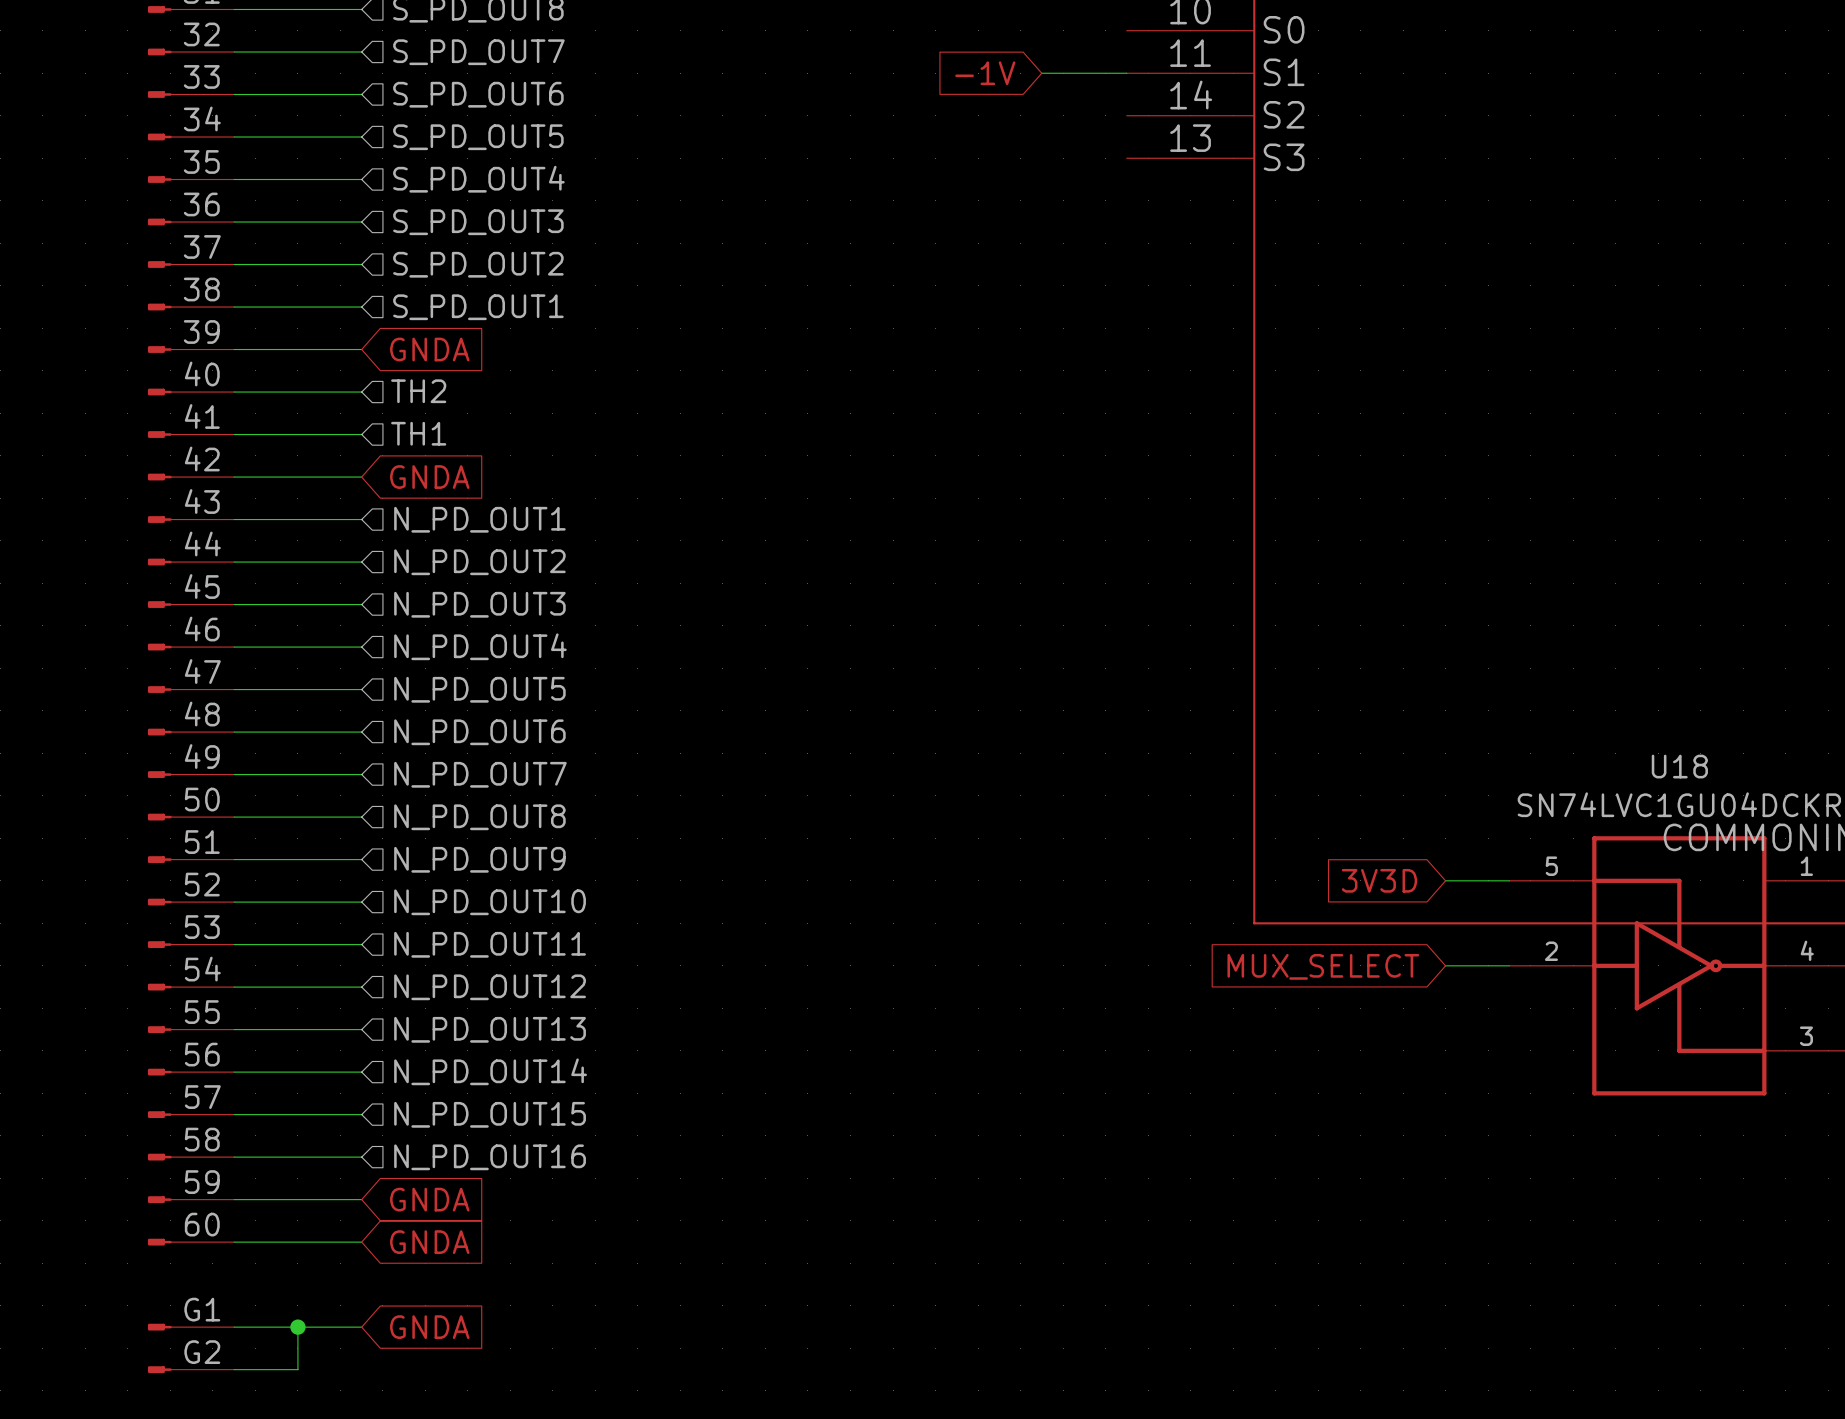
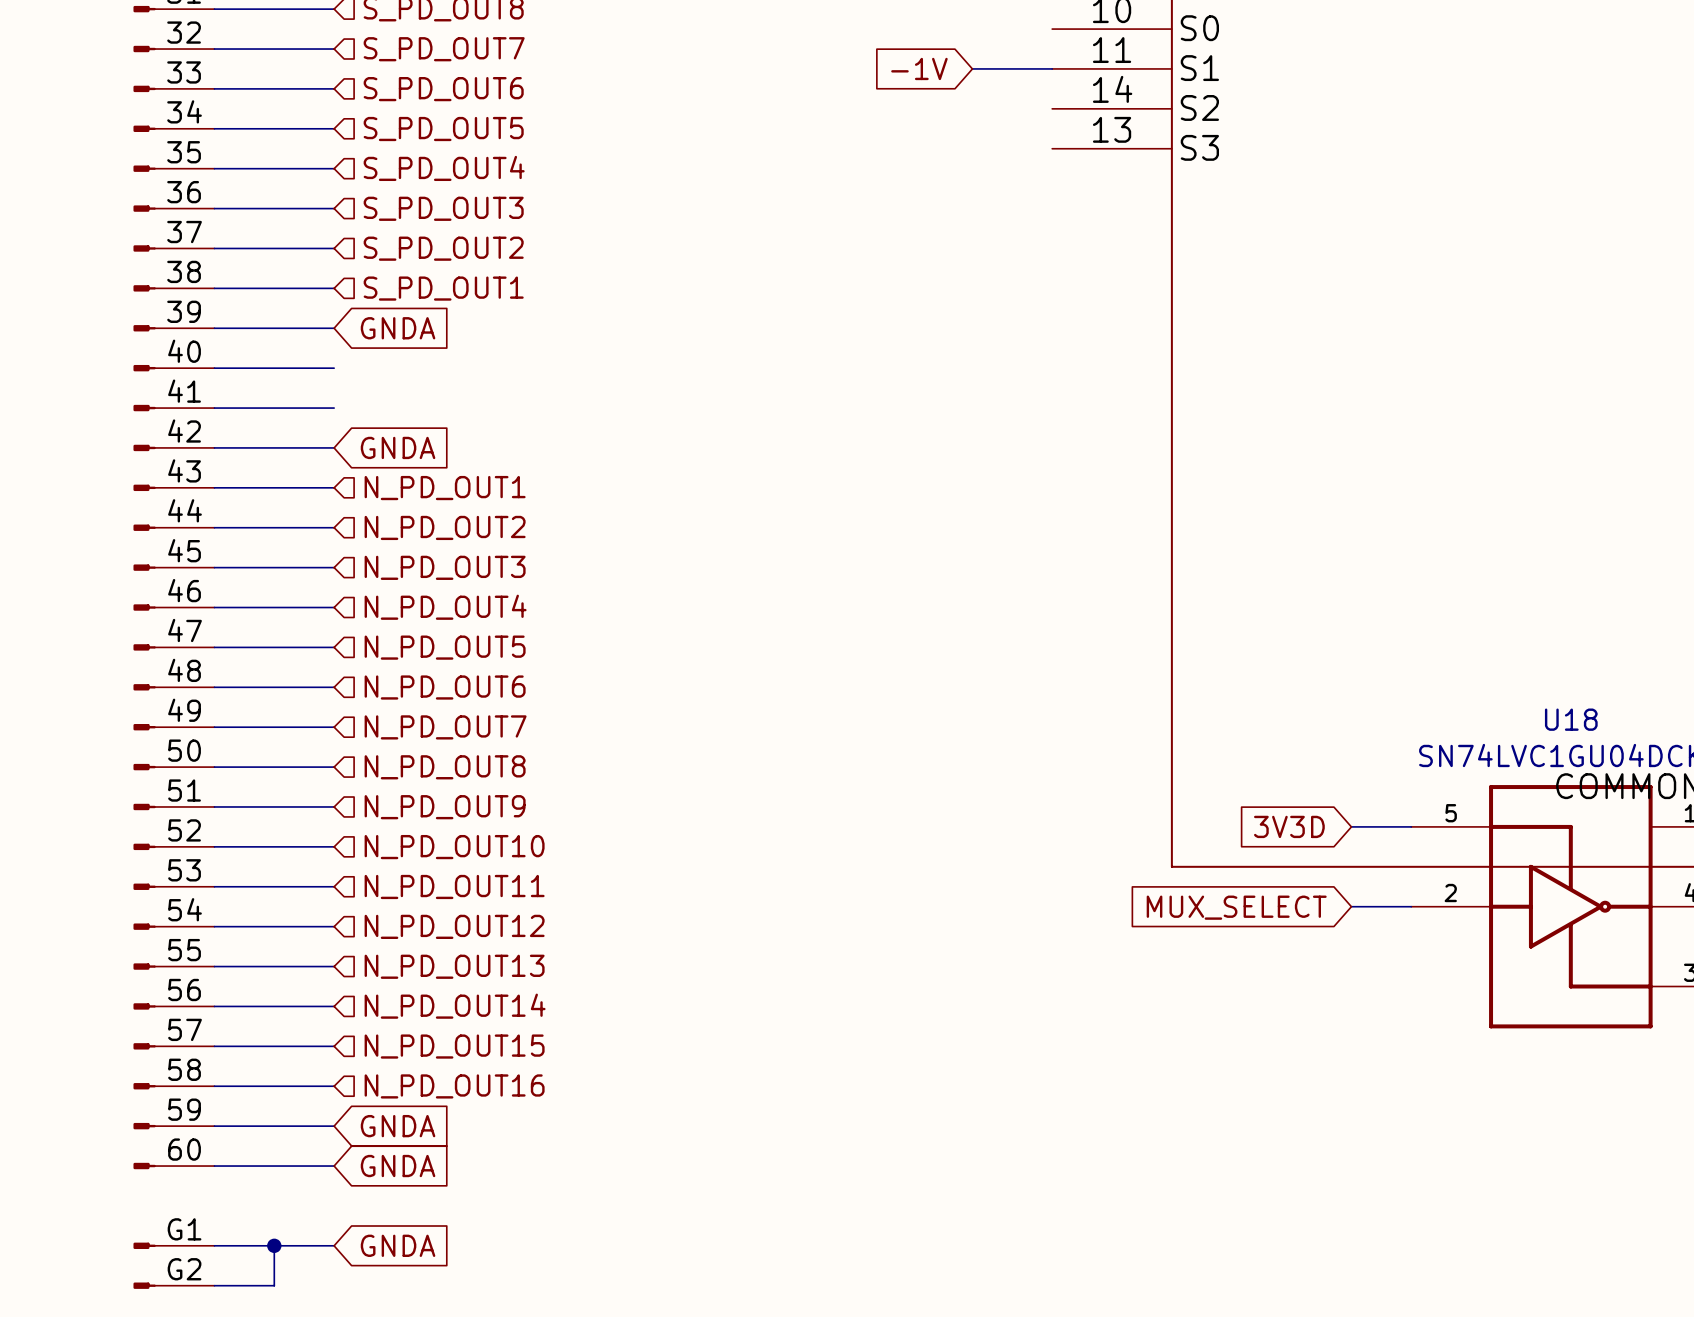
hierarchical label: TH2 (418, 391) -> none
hierarchical label: TH1 (418, 433) -> none

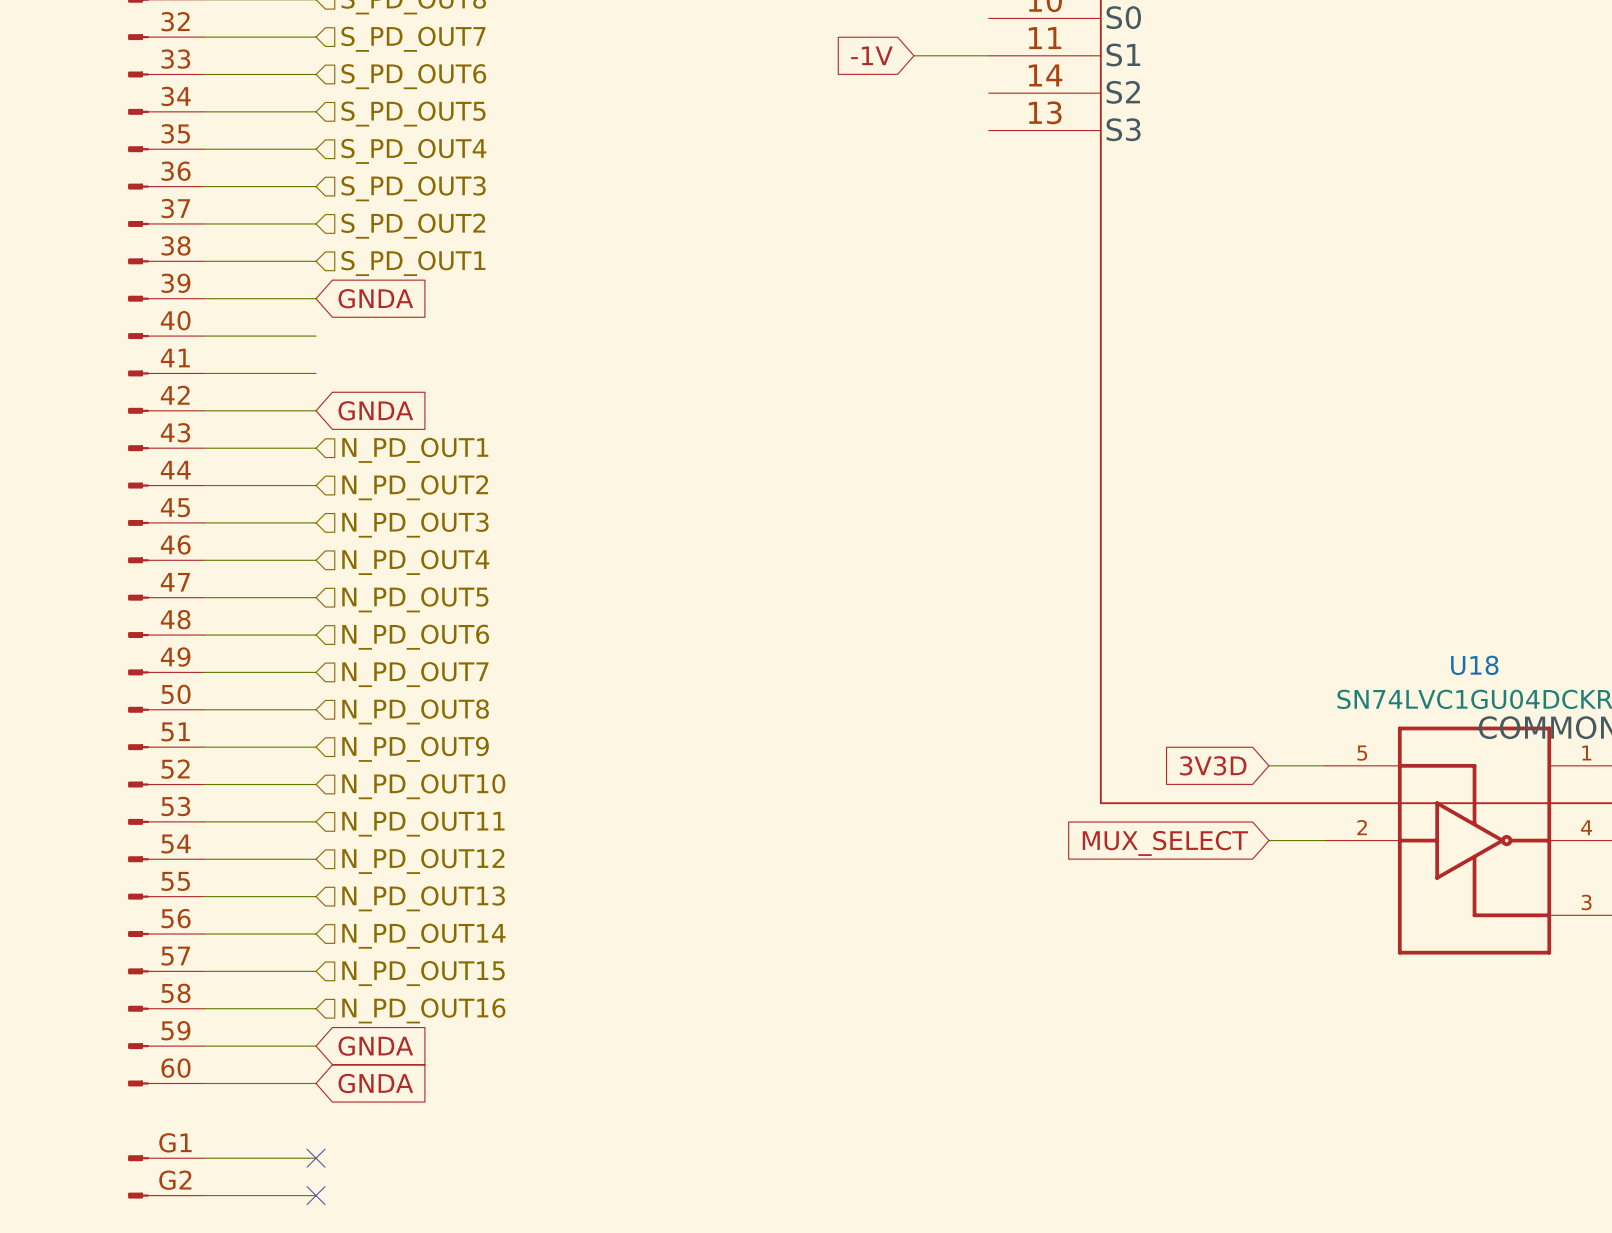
wire: (274, 1245) (274, 1285) -> (316, 1195) (259, 1195)
junction: (274, 1245) -> none
no-connect mark: none -> (316, 1158)
global label: GNDA (398, 1245) -> none
no-connect mark: none -> (316, 1195)

